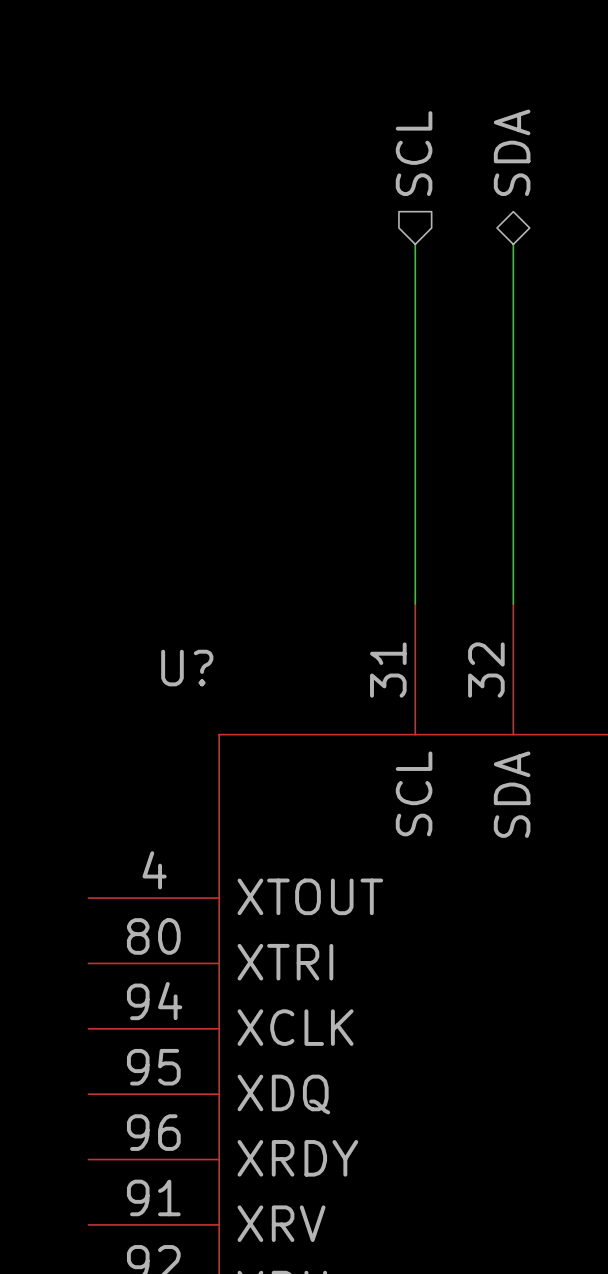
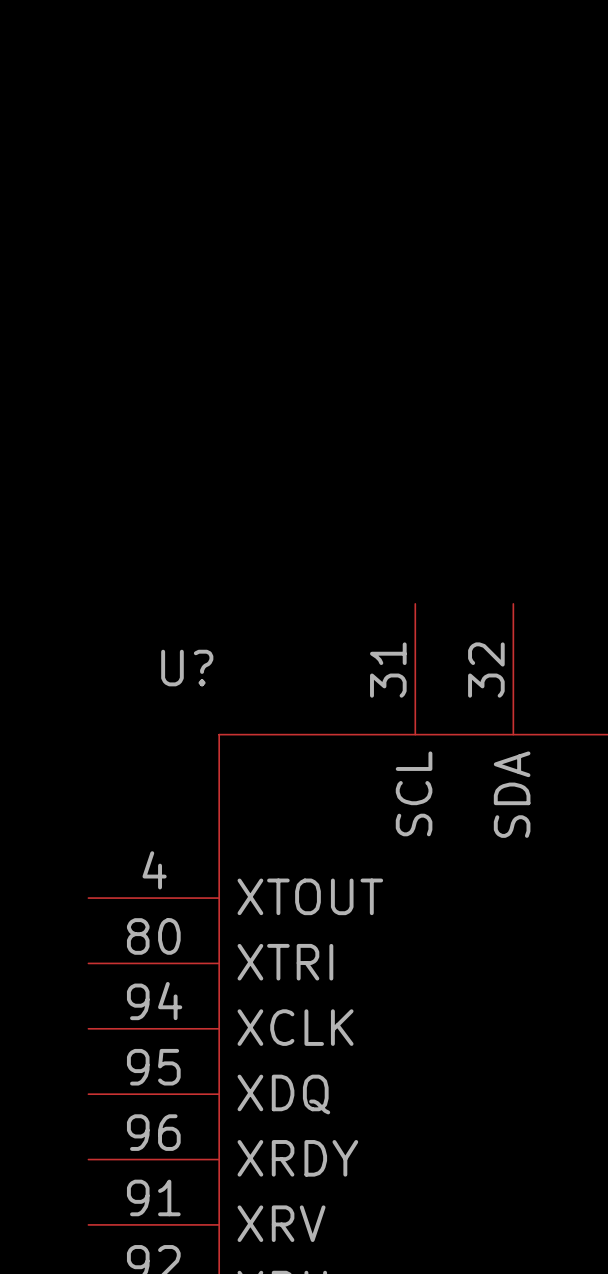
hierarchical label: SDA (512, 152) -> none
hierarchical label: SCL (414, 153) -> none
wire: (415, 244) (415, 603) -> none
wire: (513, 244) (513, 603) -> none

